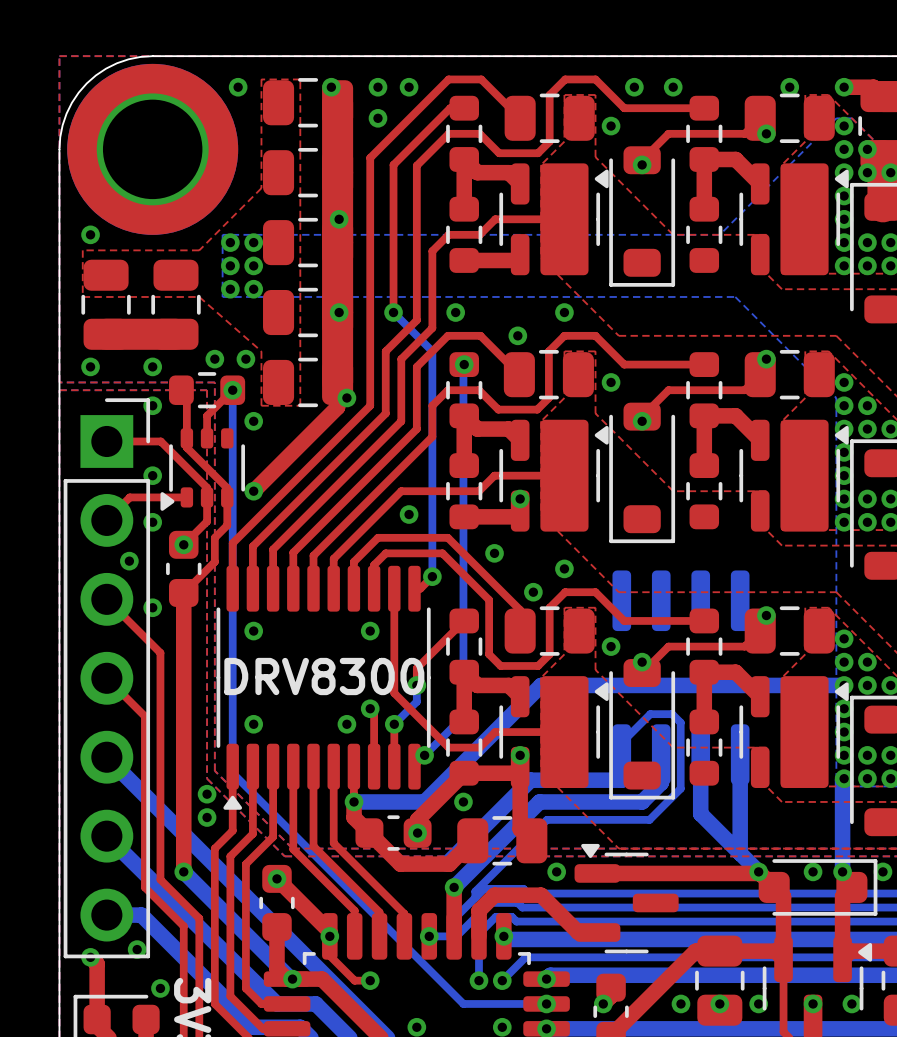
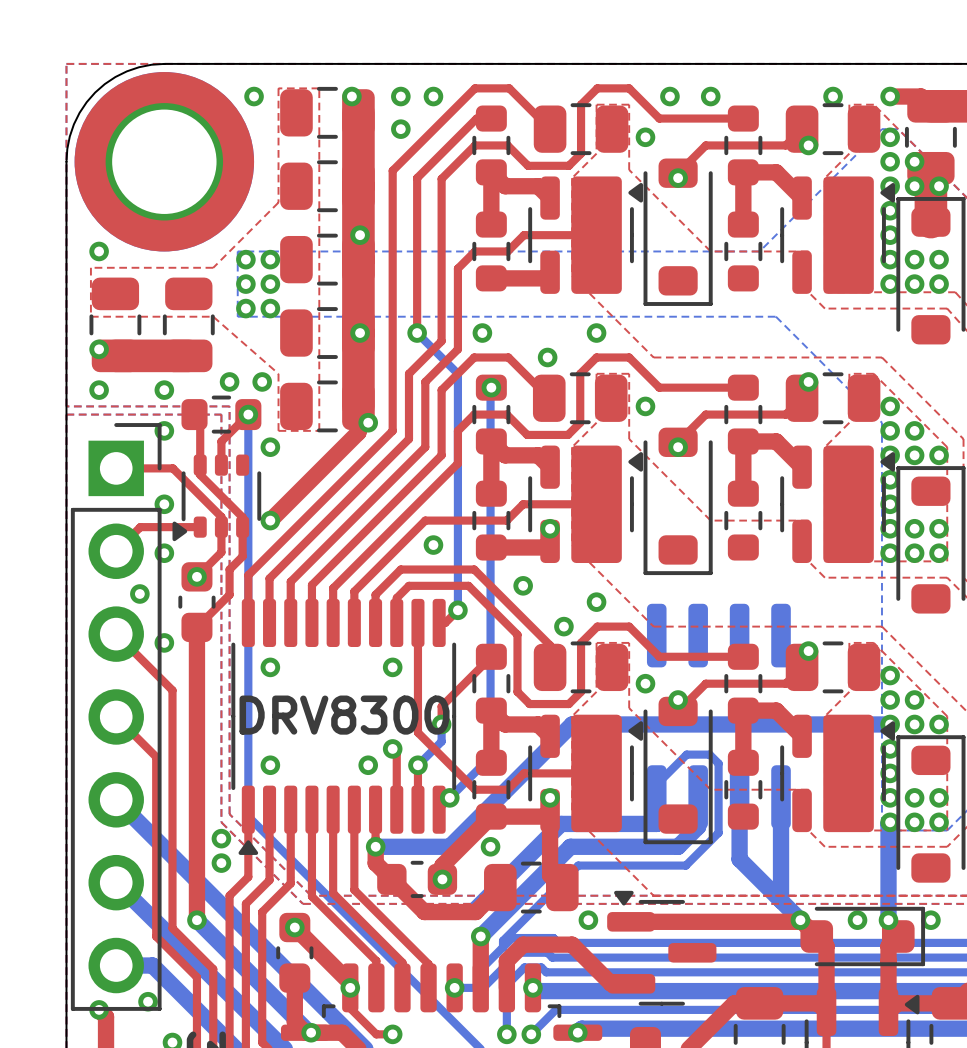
via: none -> (99, 349)

